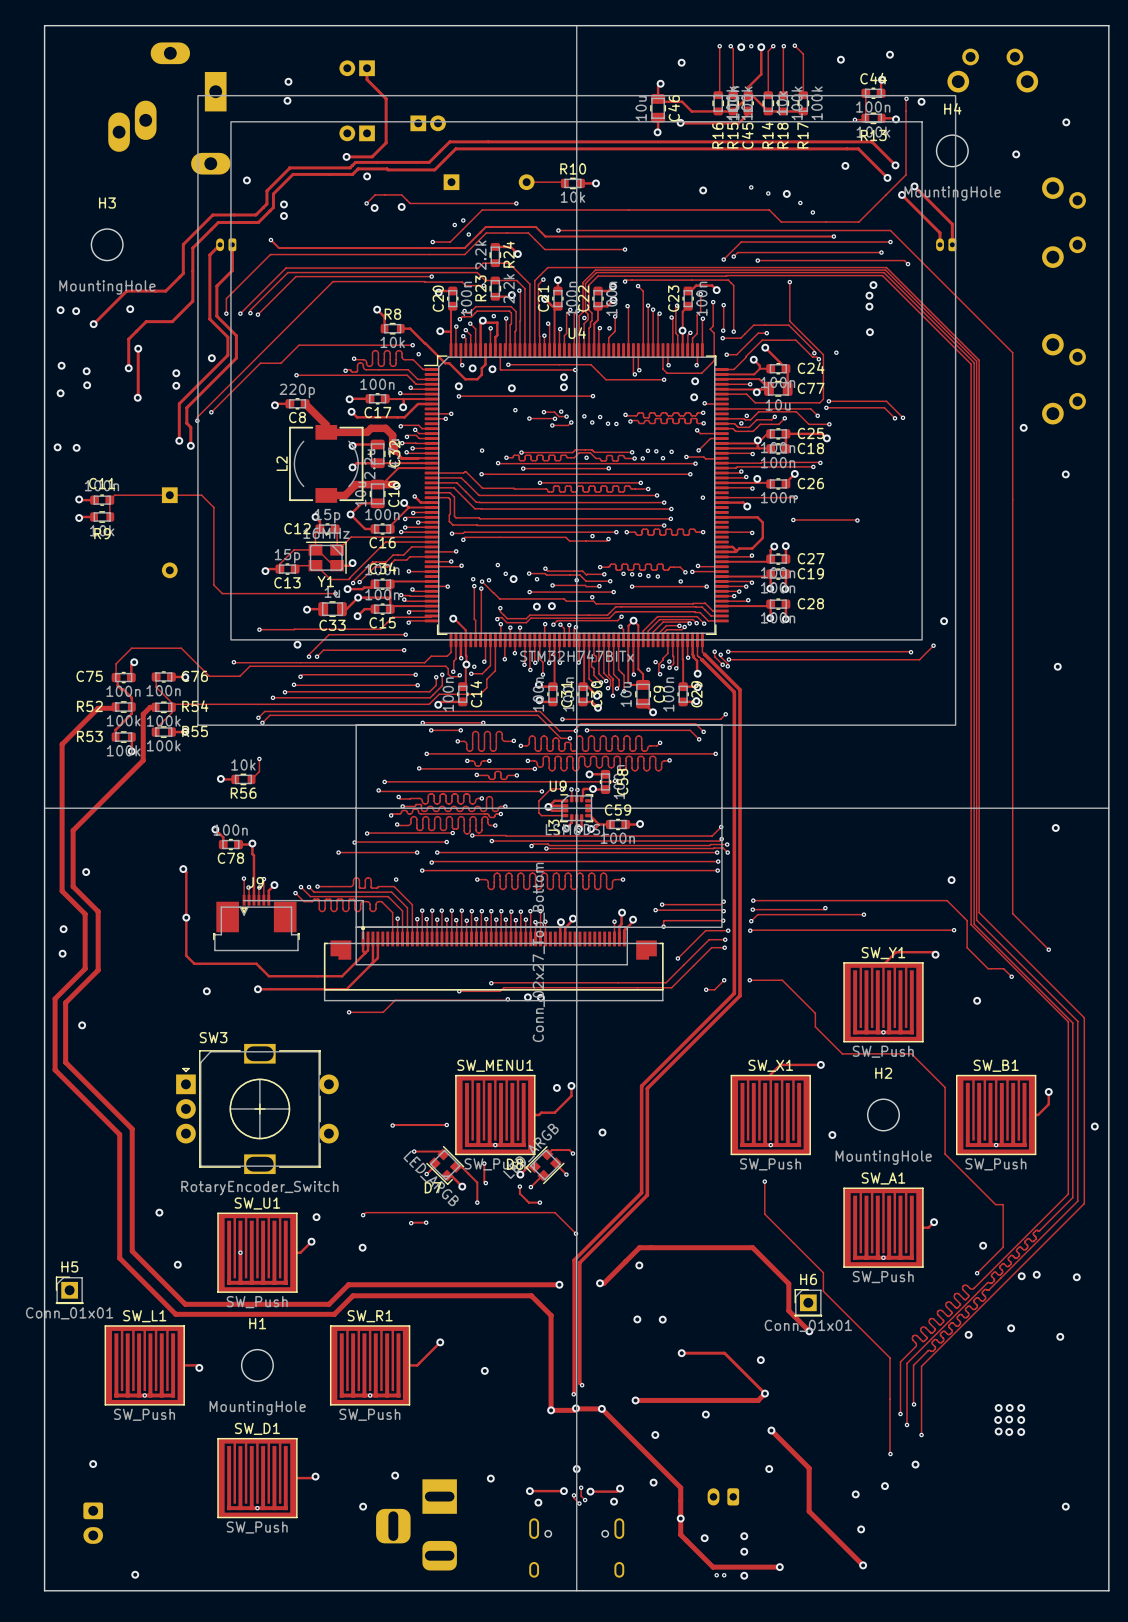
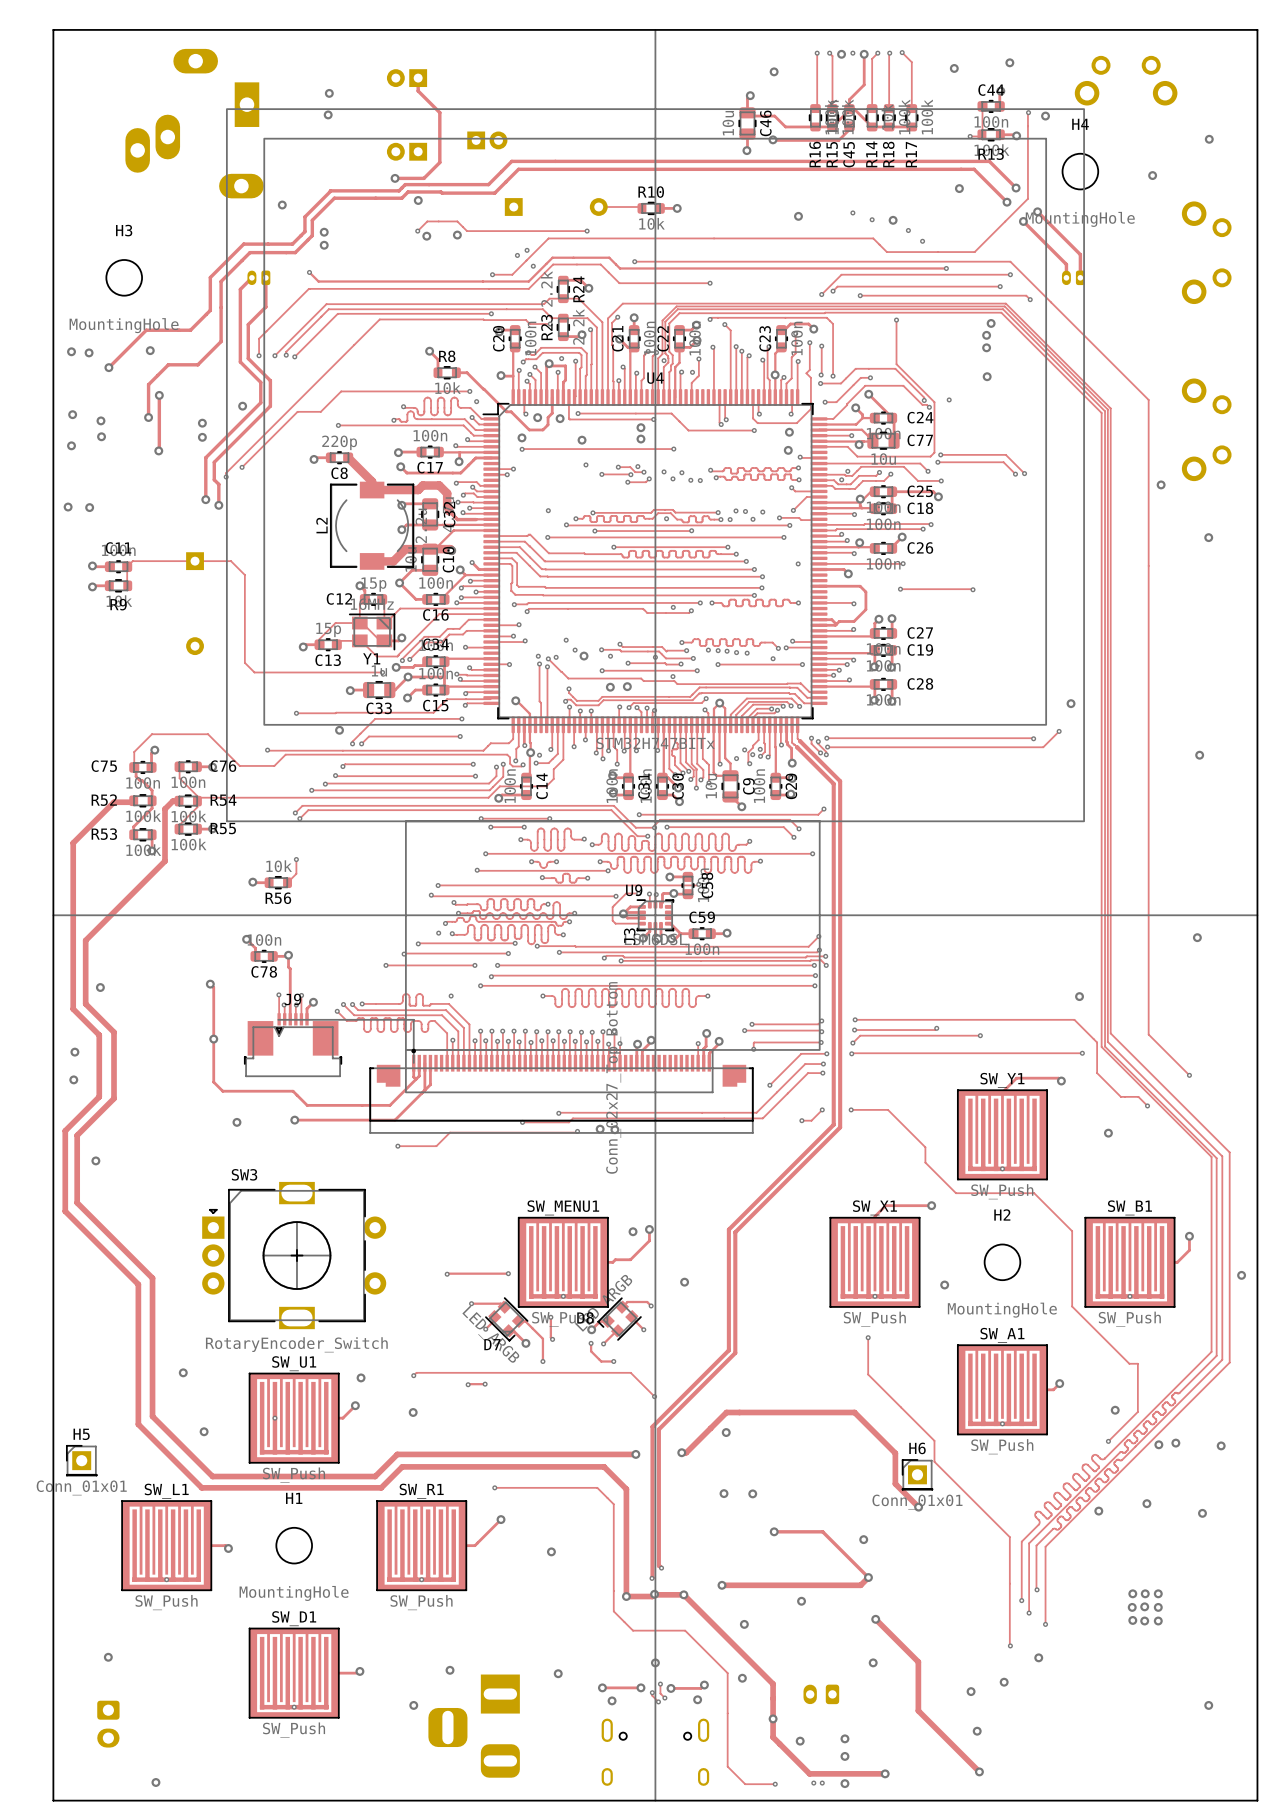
track: none -> (472, 417) (479, 424) (491, 424)
via: none -> (472, 417)
via: none -> (438, 933)
track: none -> (494, 1487) (597, 1487) (613, 1504) (613, 1611) (633, 1630) (685, 1630) (727, 1673) (727, 1766) (745, 1784) (775, 1784)
via: none -> (494, 1487)
via: none -> (775, 1784)

